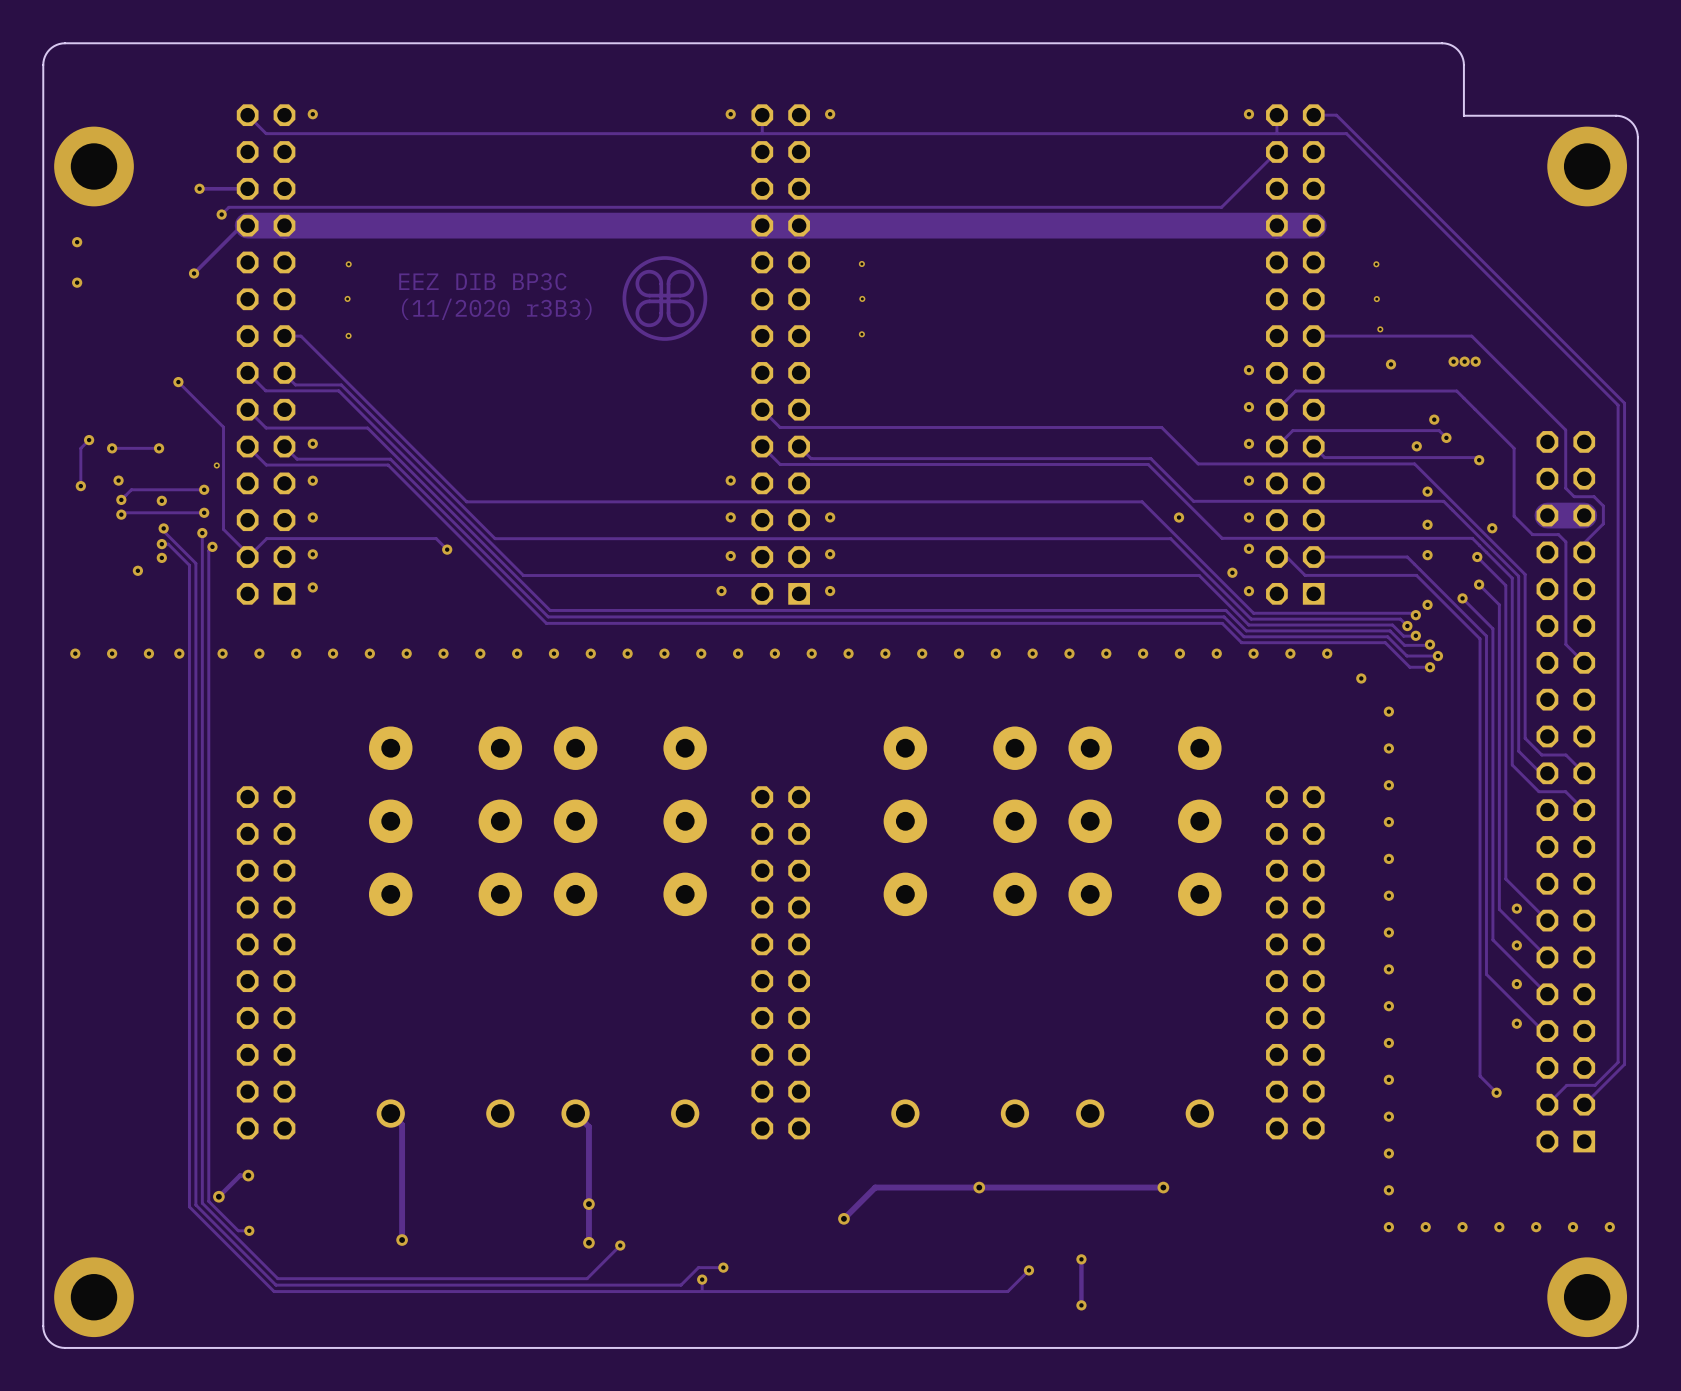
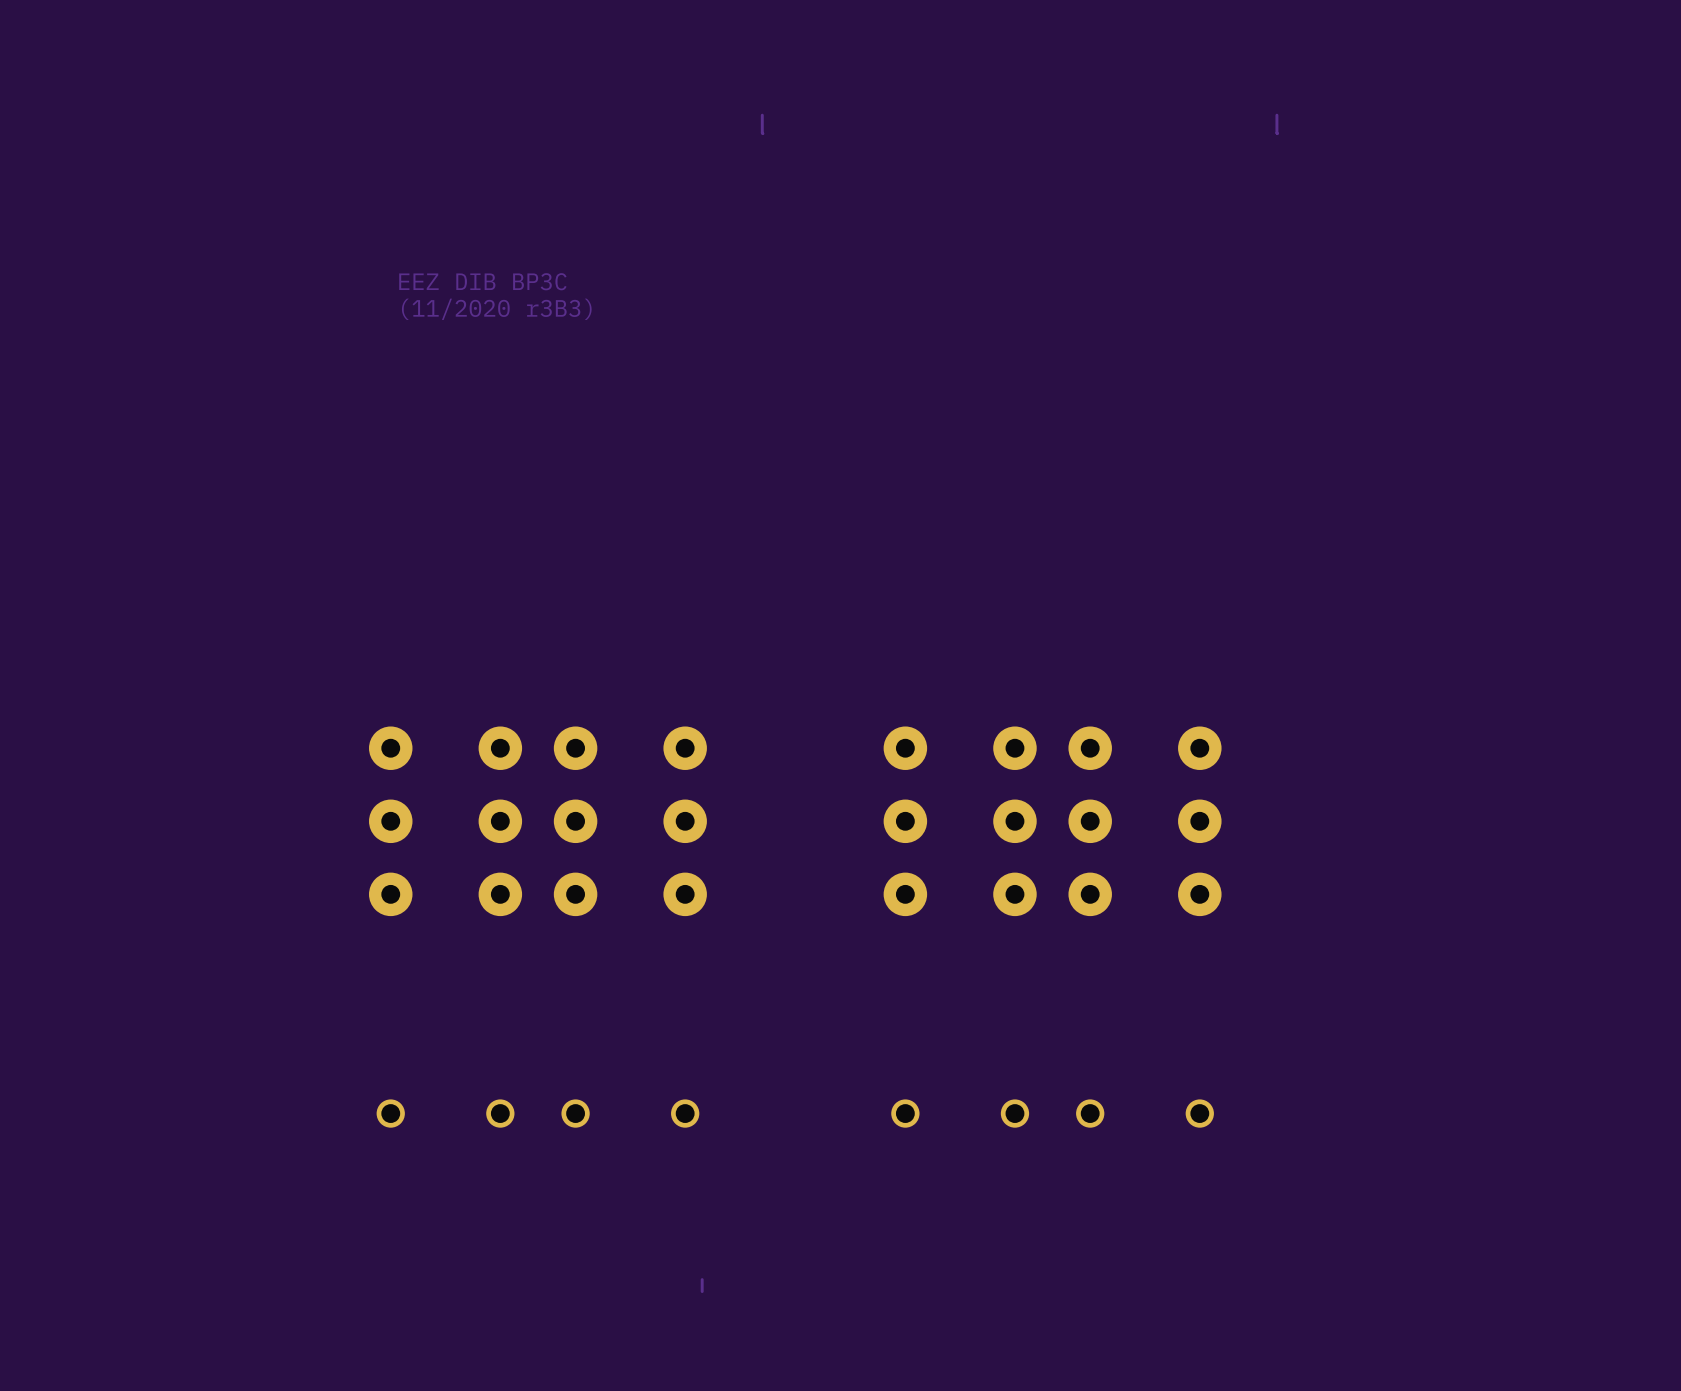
board edge: (1442, 43) (65, 43) (56, 44) (49, 49) (44, 56) (43, 65) (43, 1326) (44, 1334) (49, 1341) (56, 1346) (65, 1347) (1616, 1347) (1624, 1346) (1631, 1341) (1636, 1334) (1637, 1326) (1637, 134) (1631, 122) (1618, 115) (1463, 115) (1463, 59) (1455, 47) (1442, 43) -> none
via: (312, 114) -> none
via: (730, 114) -> none
via: (830, 114) -> none
via: (1248, 114) -> none
track: (247, 115) (266, 133) (1346, 133) (1618, 405) (1618, 1062) (1595, 1085) (1566, 1085) (1547, 1104) -> none
track: (1313, 115) (1336, 115) (1624, 403) (1624, 1064) (1584, 1104) -> none
track: (1276, 151) (1221, 207) (228, 207) (221, 214) -> none
via: (94, 166) -> none
via: (1587, 166) -> none
via: (199, 188) -> none
track: (247, 188) (199, 188) -> none
via: (221, 214) -> none
track: (1313, 225) (241, 225) (194, 273) -> none
via: (77, 242) -> none
drawing: [622, 256, 708, 341] -> none
via: (861, 263) -> none
via: (348, 264) -> none
via: (1376, 264) -> none
via: (194, 273) -> none
via: (77, 282) -> none
via: (347, 298) -> none
via: (862, 298) -> none
via: (1376, 299) -> none
via: (1380, 329) -> none
via: (861, 334) -> none
via: (348, 335) -> none
track: (284, 336) (300, 336) (466, 501) (1142, 501) (1253, 613) (1413, 613) (1415, 615) -> none
track: (1313, 336) (1471, 336) (1565, 430) (1565, 488) (1574, 496) (1594, 496) (1603, 506) (1603, 523) (1584, 542) (1584, 552) -> none
part: (266, 354) -> none
part: (780, 354) -> none
part: (1295, 354) -> none
via: (1453, 361) -> none
via: (1464, 361) -> none
via: (1475, 361) -> none
via: (1391, 364) -> none
via: (1248, 370) -> none
track: (247, 372) (265, 390) (338, 390) (523, 575) (1199, 575) (1248, 625) (1392, 625) (1403, 636) (1415, 635) -> none
track: (284, 373) (295, 384) (341, 384) (495, 538) (1170, 538) (1251, 619) (1400, 619) (1407, 626) -> none
track: (178, 382) (223, 427) (223, 529) (247, 553) (247, 557) (266, 538) (436, 538) (447, 549) -> none
via: (178, 382) -> none
via: (1248, 407) -> none
track: (247, 409) (266, 428) (367, 428) (550, 610) (1225, 610) (1246, 630) (1390, 630) (1404, 645) (1430, 644) -> none
track: (762, 409) (780, 427) (1161, 427) (1198, 463) (1414, 463) (1525, 574) (1525, 738) (1541, 755) (1565, 755) (1584, 773) -> none
track: (1276, 409) (1295, 391) (1456, 391) (1514, 448) (1514, 516) (1532, 534) (1558, 534) (1565, 542) (1565, 644) (1584, 662) -> none
via: (1434, 419) -> none
track: (1446, 437) (1439, 430) (1292, 430) (1276, 446) -> none
via: (1446, 437) -> none
track: (89, 440) (80, 448) (80, 486) -> none
via: (89, 440) -> none
via: (312, 443) -> none
via: (1248, 443) -> none
track: (247, 446) (266, 465) (388, 465) (546, 623) (1222, 623) (1241, 642) (1385, 642) (1409, 667) (1430, 667) -> none
track: (284, 446) (297, 459) (390, 459) (548, 616) (1224, 616) (1244, 636) (1387, 636) (1406, 656) (1437, 656) -> none
track: (762, 446) (780, 464) (1148, 464) (1222, 538) (1472, 538) (1512, 578) (1512, 765) (1538, 791) (1565, 791) (1584, 810) -> none
track: (799, 446) (811, 458) (1150, 458) (1193, 501) (1443, 501) (1518, 576) (1518, 751) (1540, 773) (1547, 773) -> none
track: (1313, 446) (1324, 457) (1476, 457) (1479, 460) -> none
via: (1416, 446) -> none
via: (112, 448) -> none
track: (159, 448) (112, 448) -> none
via: (159, 448) -> none
via: (1479, 460) -> none
via: (216, 465) -> none
via: (118, 480) -> none
via: (312, 480) -> none
via: (730, 480) -> none
via: (1248, 480) -> none
via: (80, 486) -> none
track: (204, 489) (131, 489) (121, 499) -> none
via: (204, 489) -> none
via: (1427, 491) -> none
via: (121, 499) -> none
via: (161, 500) -> none
track: (204, 512) (123, 512) (121, 514) -> none
via: (204, 512) -> none
via: (121, 514) -> none
track: (1584, 515) (1547, 515) -> none
via: (312, 517) -> none
via: (730, 517) -> none
via: (830, 517) -> none
via: (1179, 517) -> none
via: (1248, 517) -> none
via: (1427, 524) -> none
track: (163, 528) (163, 531) (195, 563) (195, 1205) (275, 1285) (681, 1285) (698, 1267) (723, 1267) -> none
via: (163, 528) -> none
via: (1492, 528) -> none
track: (202, 533) (202, 1203) (277, 1278) (587, 1278) (620, 1245) -> none
via: (202, 533) -> none
track: (161, 544) (168, 544) (189, 565) (189, 1206) (274, 1291) (1007, 1291) (1028, 1270) -> none
via: (161, 544) -> none
track: (212, 546) (208, 550) (208, 1201) (238, 1230) (249, 1230) -> none
via: (212, 546) -> none
via: (1248, 548) -> none
via: (447, 549) -> none
via: (312, 554) -> none
via: (830, 554) -> none
via: (1427, 555) -> none
via: (730, 556) -> none
track: (1477, 556) (1505, 585) (1505, 878) (1547, 920) -> none
via: (1477, 556) -> none
via: (161, 557) -> none
track: (1276, 557) (1286, 557) (1305, 575) (1416, 575) (1480, 638) (1480, 1076) (1496, 1092) -> none
track: (1313, 557) (1407, 557) (1486, 636) (1486, 974) (1543, 1031) (1547, 1031) -> none
via: (137, 570) -> none
via: (1232, 572) -> none
track: (1479, 584) (1499, 604) (1499, 909) (1547, 957) -> none
via: (1479, 584) -> none
via: (312, 587) -> none
via: (721, 591) -> none
via: (830, 591) -> none
via: (1248, 591) -> none
track: (1462, 598) (1492, 628) (1492, 939) (1547, 994) -> none
via: (1462, 598) -> none
via: (1427, 604) -> none
via: (1415, 615) -> none
via: (1407, 626) -> none
via: (1415, 635) -> none
via: (1430, 644) -> none
via: (75, 653) -> none
via: (112, 653) -> none
via: (148, 653) -> none
via: (179, 653) -> none
via: (222, 653) -> none
via: (259, 653) -> none
via: (296, 653) -> none
via: (333, 653) -> none
via: (369, 653) -> none
via: (406, 653) -> none
via: (443, 653) -> none
via: (480, 653) -> none
via: (517, 653) -> none
via: (553, 653) -> none
via: (590, 653) -> none
via: (627, 653) -> none
via: (664, 653) -> none
via: (701, 653) -> none
via: (738, 653) -> none
via: (774, 653) -> none
via: (811, 653) -> none
via: (848, 653) -> none
via: (885, 653) -> none
via: (922, 653) -> none
via: (959, 653) -> none
via: (995, 653) -> none
via: (1032, 653) -> none
via: (1069, 653) -> none
via: (1106, 653) -> none
via: (1143, 653) -> none
via: (1179, 653) -> none
via: (1216, 653) -> none
via: (1253, 653) -> none
via: (1290, 653) -> none
via: (1327, 653) -> none
via: (1437, 656) -> none
via: (1430, 667) -> none
via: (1361, 678) -> none
via: (1388, 711) -> none
via: (1388, 748) -> none
via: (1388, 785) -> none
part: (1565, 791) -> none
via: (1388, 822) -> none
via: (1388, 858) -> none
via: (1388, 895) -> none
via: (1516, 908) -> none
via: (1388, 932) -> none
via: (1516, 945) -> none
part: (266, 962) -> none
part: (780, 962) -> none
part: (1295, 962) -> none
via: (1388, 969) -> none
via: (1516, 984) -> none
via: (1388, 1006) -> none
via: (1516, 1023) -> none
via: (1388, 1043) -> none
via: (1388, 1079) -> none
via: (1496, 1092) -> none
track: (390, 1113) (402, 1124) (402, 1240) -> none
track: (575, 1113) (588, 1126) (588, 1242) -> none
via: (1388, 1116) -> none
via: (1388, 1153) -> none
track: (248, 1175) (240, 1175) (218, 1196) -> none
via: (248, 1175) -> none
via: (979, 1187) -> none
track: (1163, 1187) (875, 1187) (843, 1218) -> none
via: (1163, 1187) -> none
via: (1388, 1190) -> none
via: (218, 1196) -> none
via: (588, 1204) -> none
via: (843, 1218) -> none
via: (1388, 1227) -> none
via: (1425, 1227) -> none
via: (1462, 1227) -> none
via: (1499, 1227) -> none
via: (1536, 1227) -> none
via: (1573, 1227) -> none
via: (1609, 1227) -> none
via: (249, 1230) -> none
via: (402, 1240) -> none
via: (588, 1242) -> none
via: (620, 1245) -> none
track: (1081, 1259) (1081, 1305) -> none
via: (1081, 1259) -> none
via: (723, 1267) -> none
via: (1028, 1270) -> none
via: (702, 1279) -> none
via: (94, 1297) -> none
via: (1587, 1297) -> none
via: (1081, 1305) -> none

